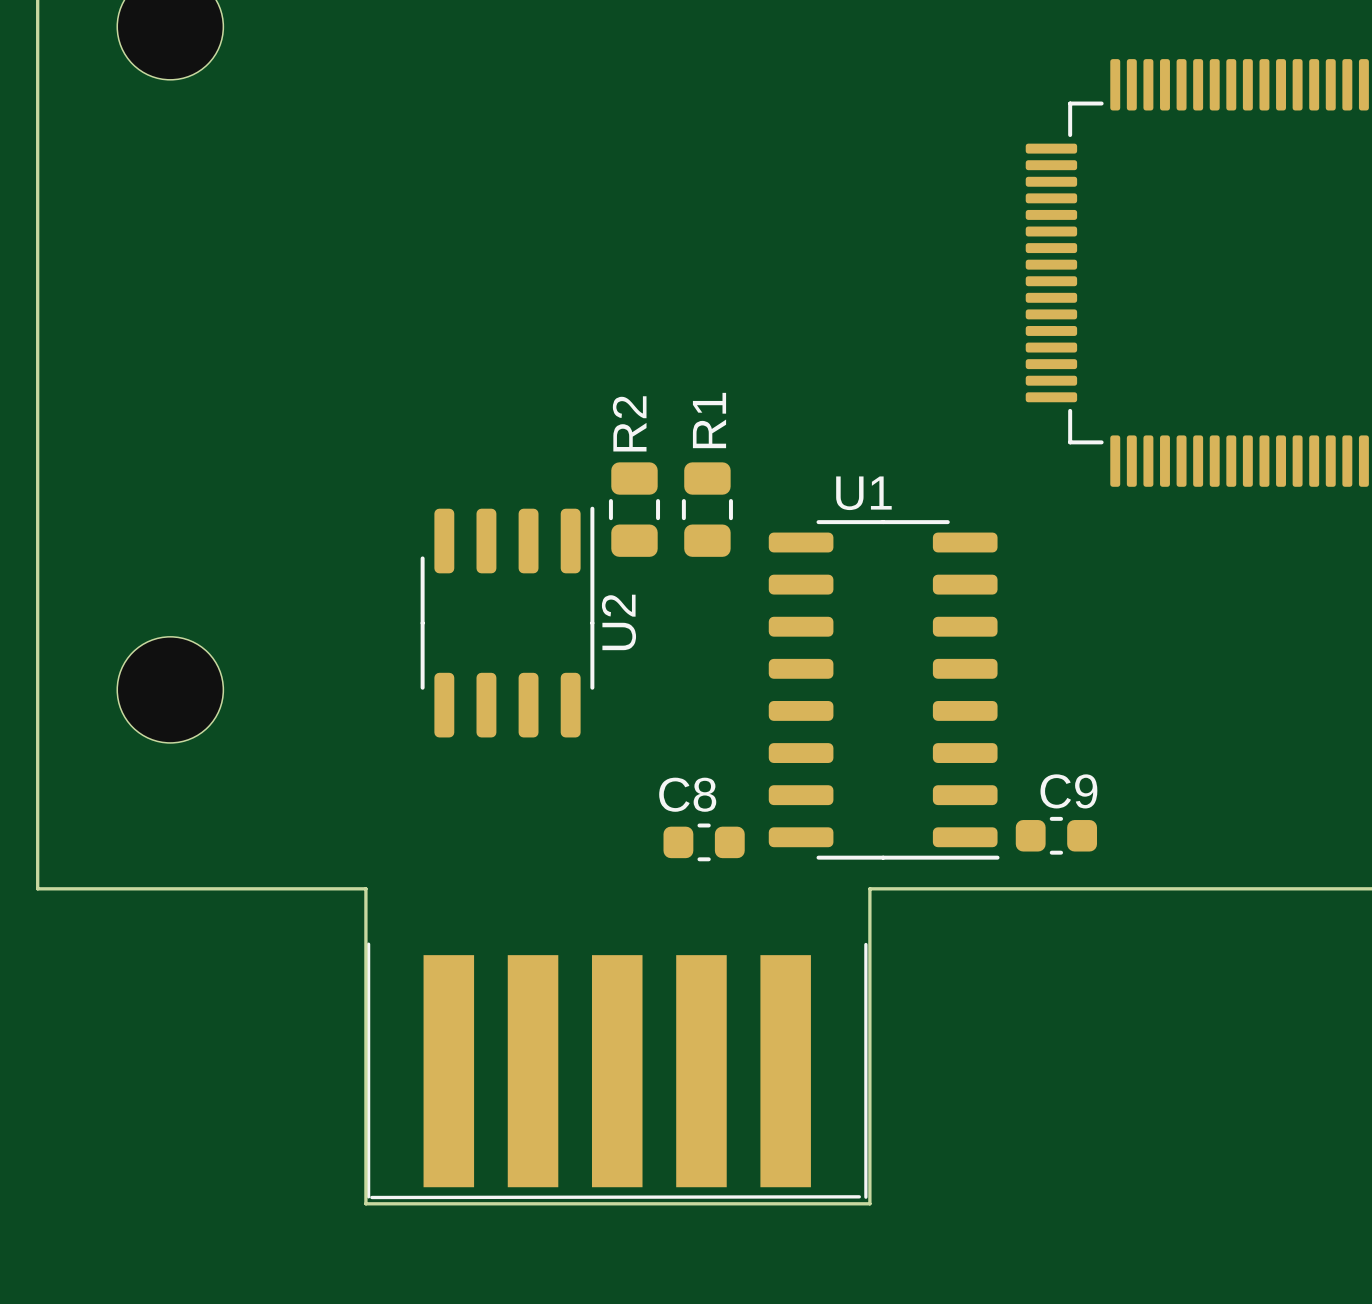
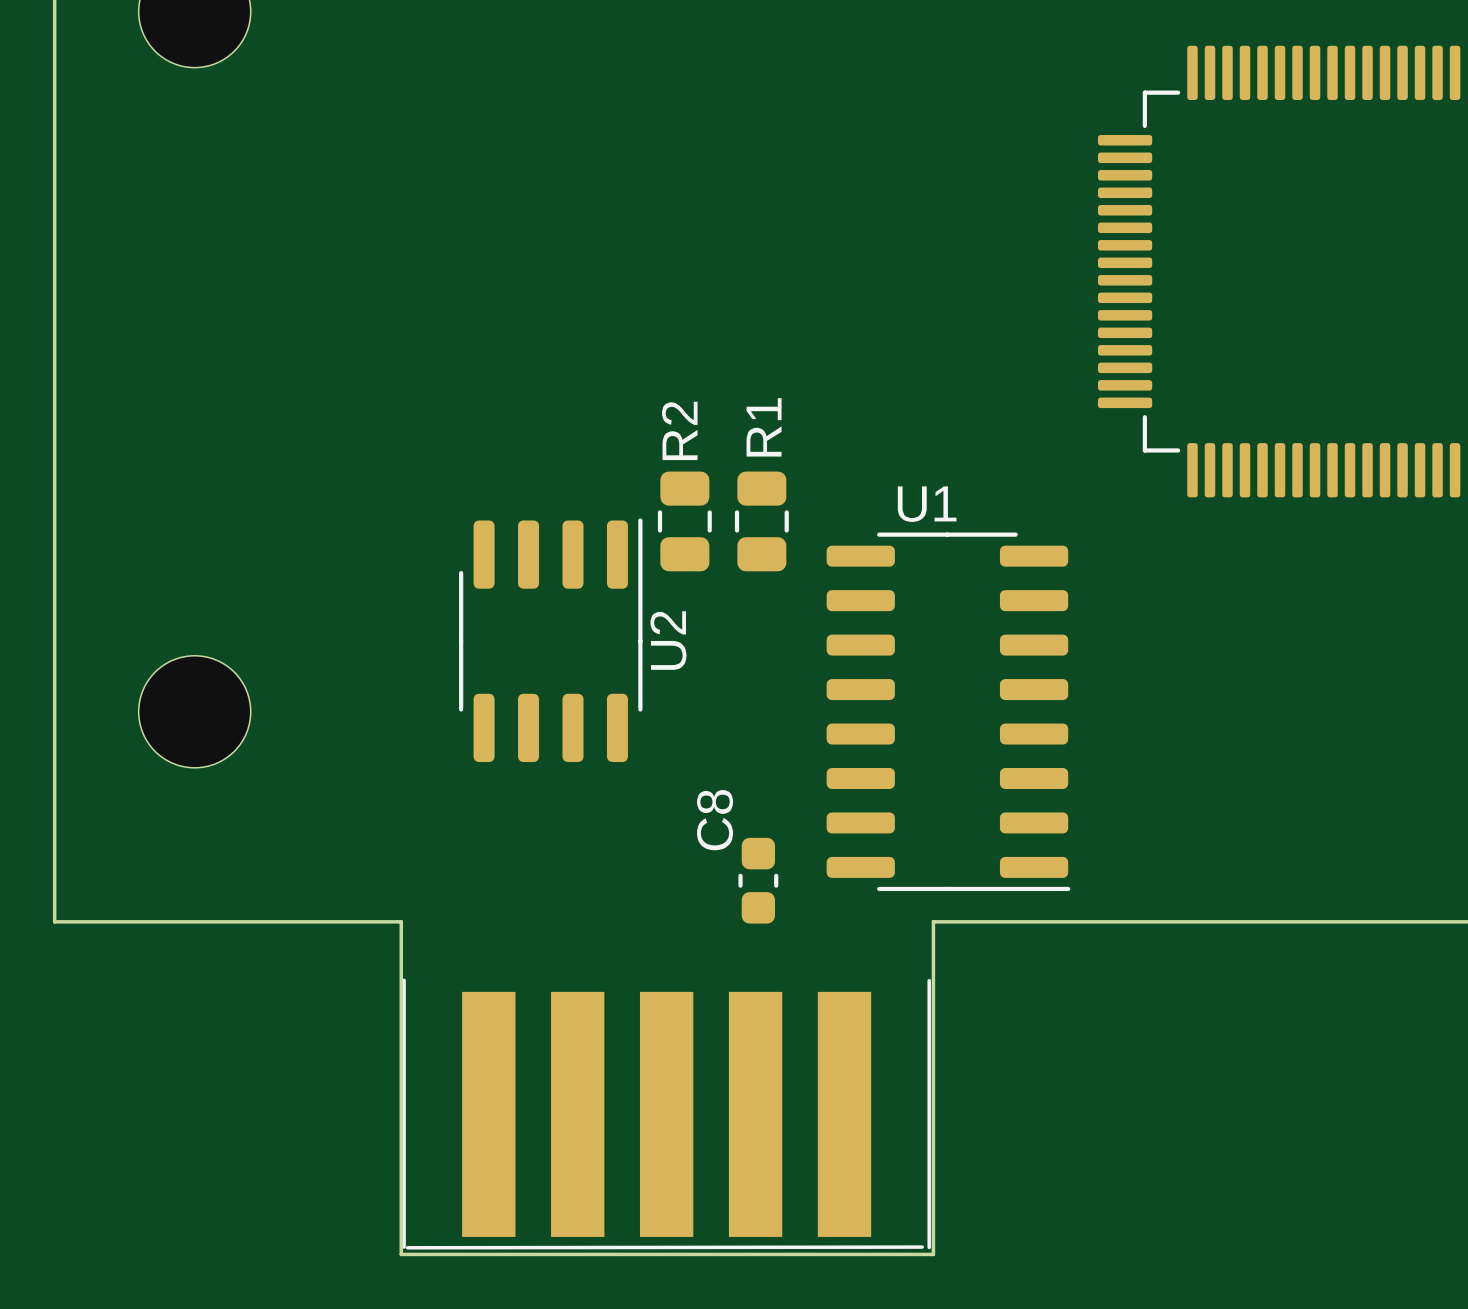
C9: (1056, 835) -> none
C8 rotation: 0° (704, 842) -> 90° clockwise (758, 880)

